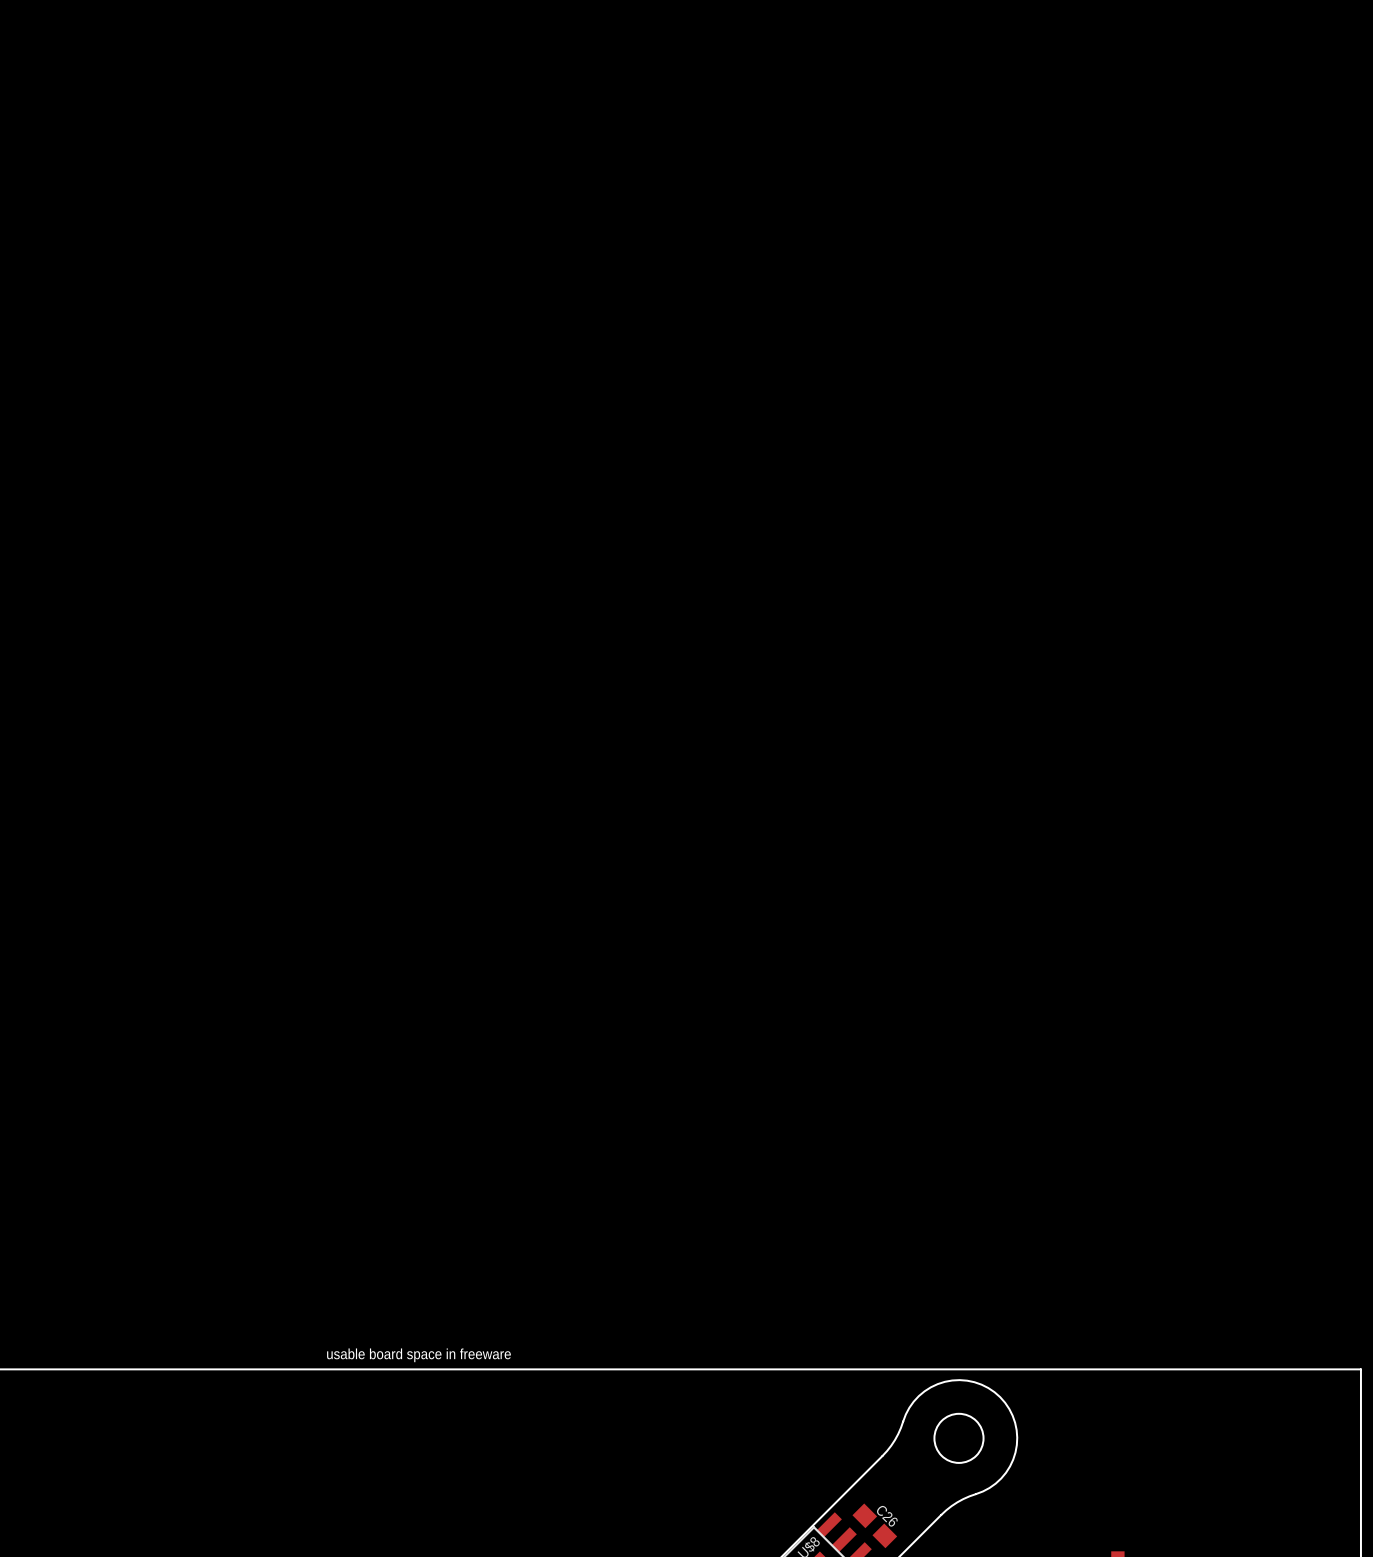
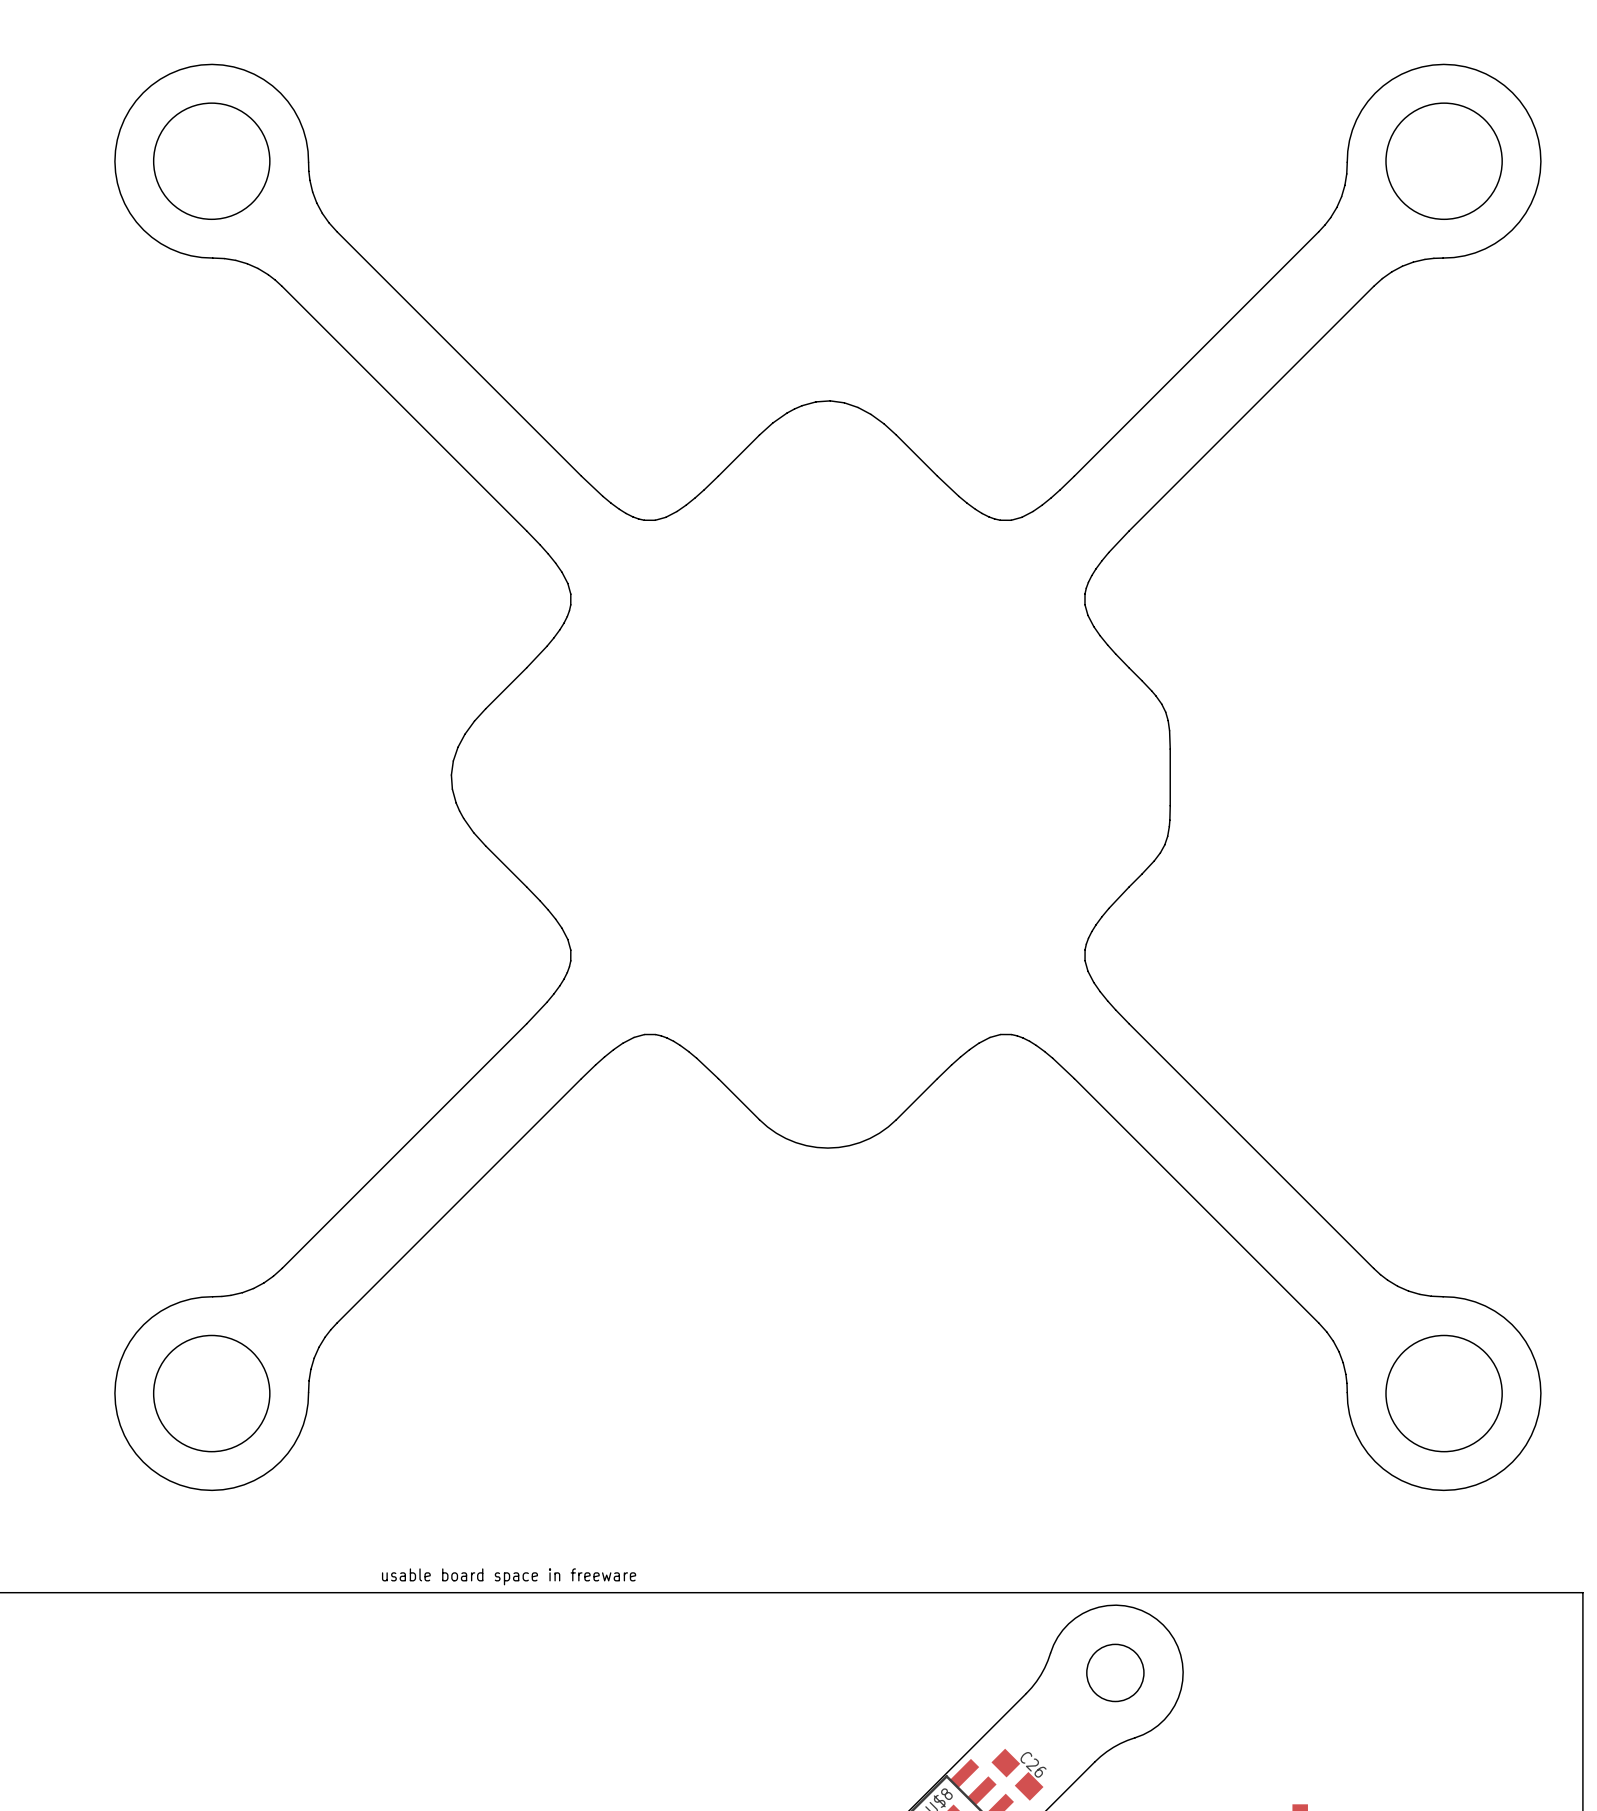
round board edge: none -> [153, 103, 270, 220]
round board edge: none -> [1385, 103, 1503, 220]
board edge: none -> (308, 162) (309, 180) (316, 203) (336, 231) (581, 476) (602, 496) (626, 513) (638, 518) (655, 520) (677, 511) (704, 489) (772, 423) (802, 405) (830, 400) (844, 402) (871, 414) (896, 435) (967, 503) (988, 516) (1000, 520) (1011, 520) (1033, 511) (1060, 489) (1325, 224) (1341, 196) (1346, 173) (1349, 140) (1356, 119) (1367, 101) (1383, 85) (1411, 70) (1443, 64) (1475, 69) (1495, 79) (1512, 92) (1531, 119) (1540, 150) (1540, 172) (1535, 193) (1519, 222) (1503, 237) (1485, 248) (1464, 255) (1413, 262) (1402, 266) (1382, 278) (1108, 552) (1088, 582) (1085, 593) (1084, 604) (1087, 615) (1100, 635) (1161, 704) (1168, 720) (1170, 749) (1169, 820) (1164, 844) (1154, 860) (1108, 908) (1091, 931) (1085, 949) (1087, 971) (1100, 991) (1115, 1009) (1380, 1274) (1408, 1291) (1431, 1296) (1464, 1298) (1485, 1306) (1503, 1317) (1519, 1332) (1535, 1361) (1540, 1382) (1540, 1404) (1531, 1435) (1512, 1462) (1485, 1480) (1454, 1489) (1432, 1489) (1411, 1484) (1383, 1468) (1367, 1453) (1356, 1434) (1349, 1414) (1343, 1362) (1339, 1351) (1326, 1331) (1052, 1058) (1022, 1037) (1011, 1034) (1000, 1034) (978, 1043) (960, 1057) (896, 1119) (879, 1133) (859, 1142) (827, 1148) (795, 1142) (776, 1133) (759, 1119) (696, 1058) (673, 1041) (655, 1034) (634, 1037) (613, 1049) (595, 1065) (330, 1329) (314, 1358) (309, 1380) (306, 1414) (299, 1434) (287, 1453) (272, 1468) (244, 1484) (222, 1489) (201, 1489) (169, 1480) (143, 1462) (129, 1445) (120, 1425) (114, 1393) (120, 1361) (136, 1332) (151, 1317) (170, 1306) (191, 1298) (242, 1292) (253, 1288) (273, 1276) (526, 1023) (559, 985) (567, 972) (570, 960) (567, 939) (555, 919) (485, 845) (463, 818) (456, 803) (451, 775) (458, 747) (474, 721) (546, 646) (564, 623) (569, 610) (570, 594) (561, 572) (526, 530) (275, 280) (258, 268) (235, 260) (201, 257) (180, 252) (160, 243) (143, 230) (130, 213) (120, 193) (114, 161) (120, 129) (129, 109) (143, 92) (160, 79) (179, 69) (212, 64) (244, 70) (263, 79) (280, 93) (299, 119) (306, 140) (308, 162)
round board edge: none -> [153, 1335, 270, 1452]
round board edge: none -> [1385, 1335, 1503, 1452]

